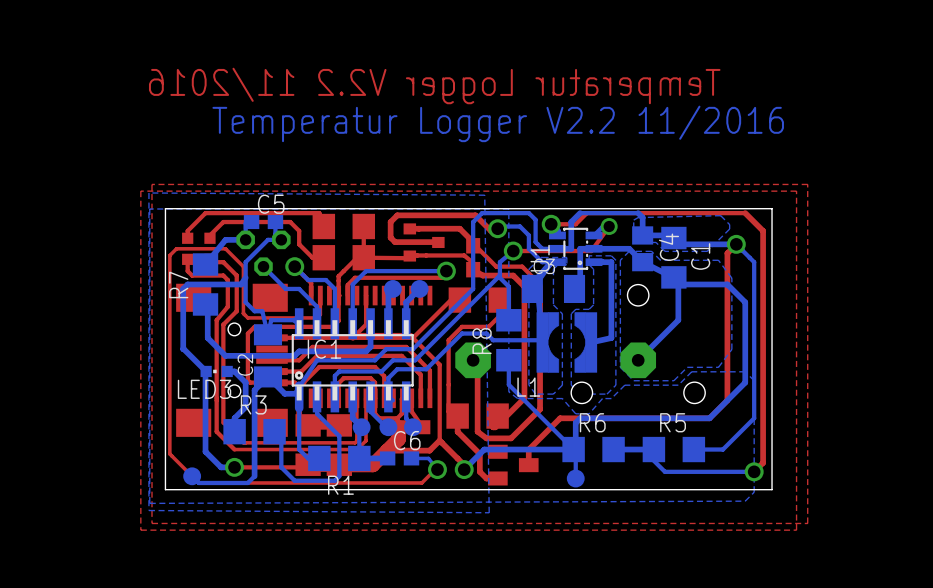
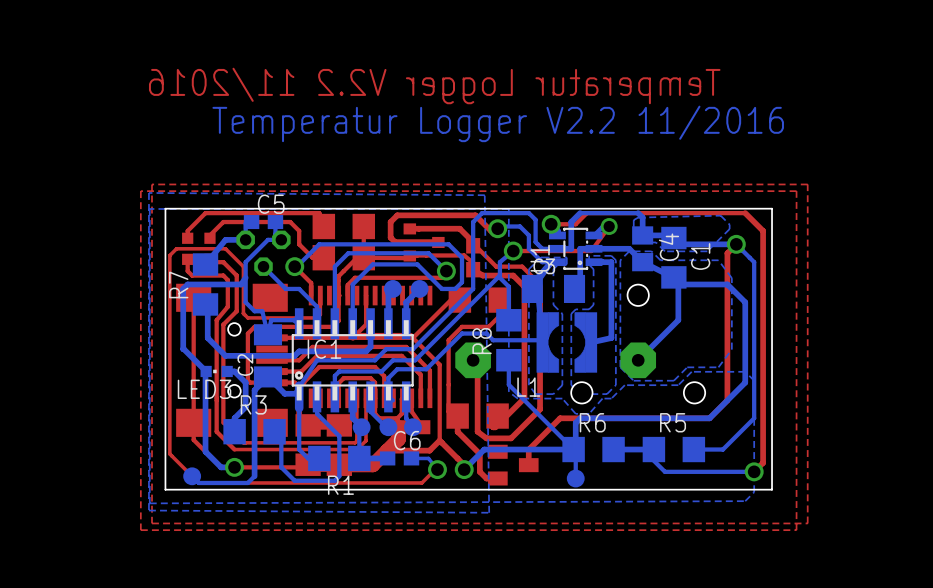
bottom track: (294, 266) (308, 280) (325, 280) (334, 288) -> (446, 271) (428, 253) (348, 253) (334, 266) (334, 288)
bottom track: (444, 271) (366, 271) -> (294, 268) (319, 244) (448, 244) (462, 257) (462, 282) (455, 288) (441, 288) (417, 264) (372, 264) (366, 271)
top track: none -> (193, 297) (193, 439) (221, 467) (234, 467)

